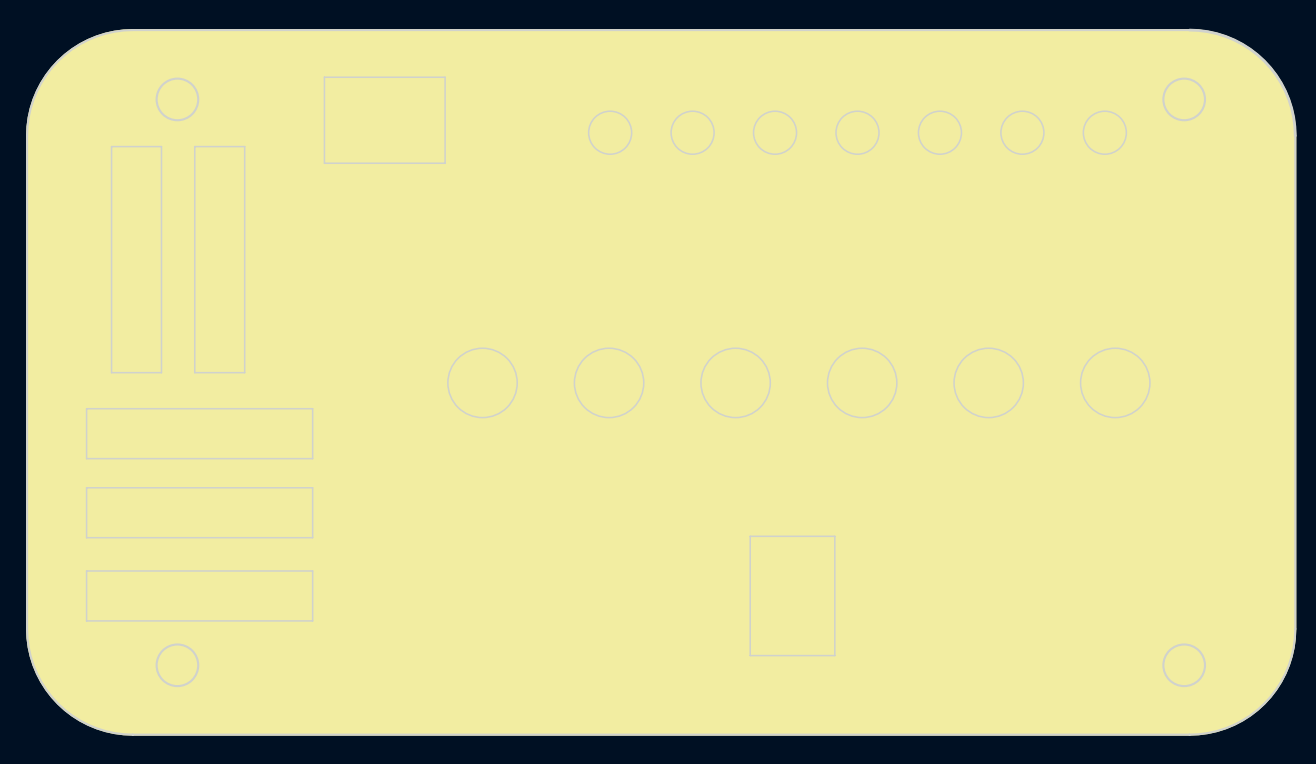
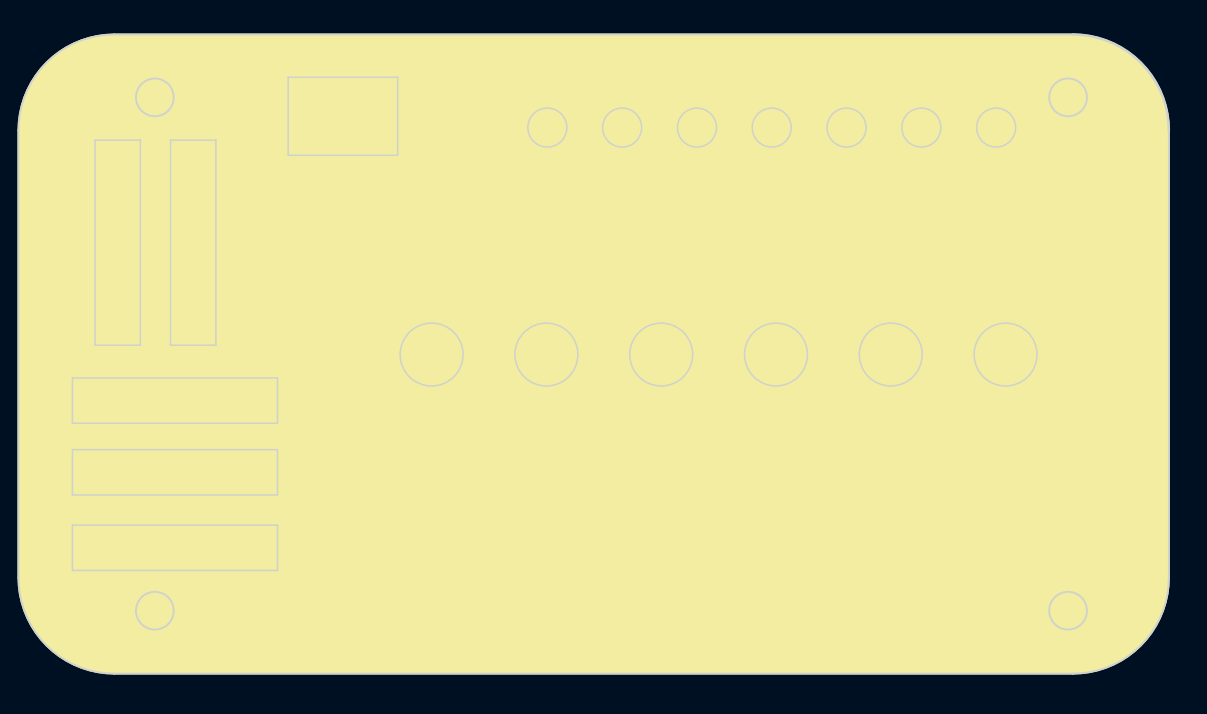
board edge: (834, 536) (750, 536) (750, 655) (834, 655) (834, 536) -> none

